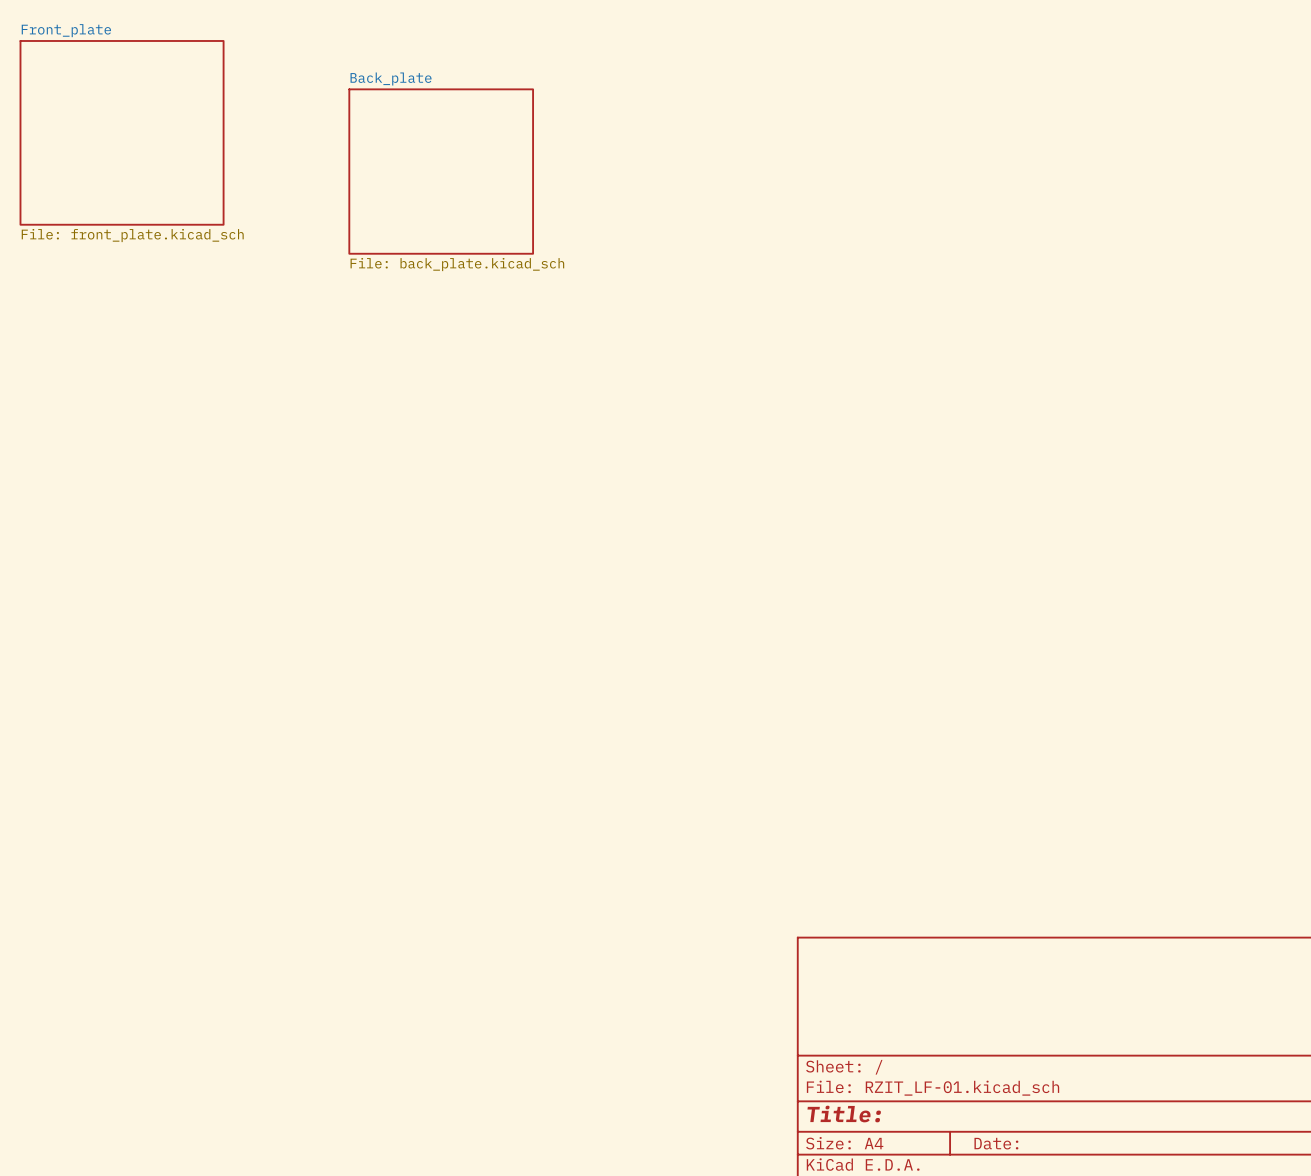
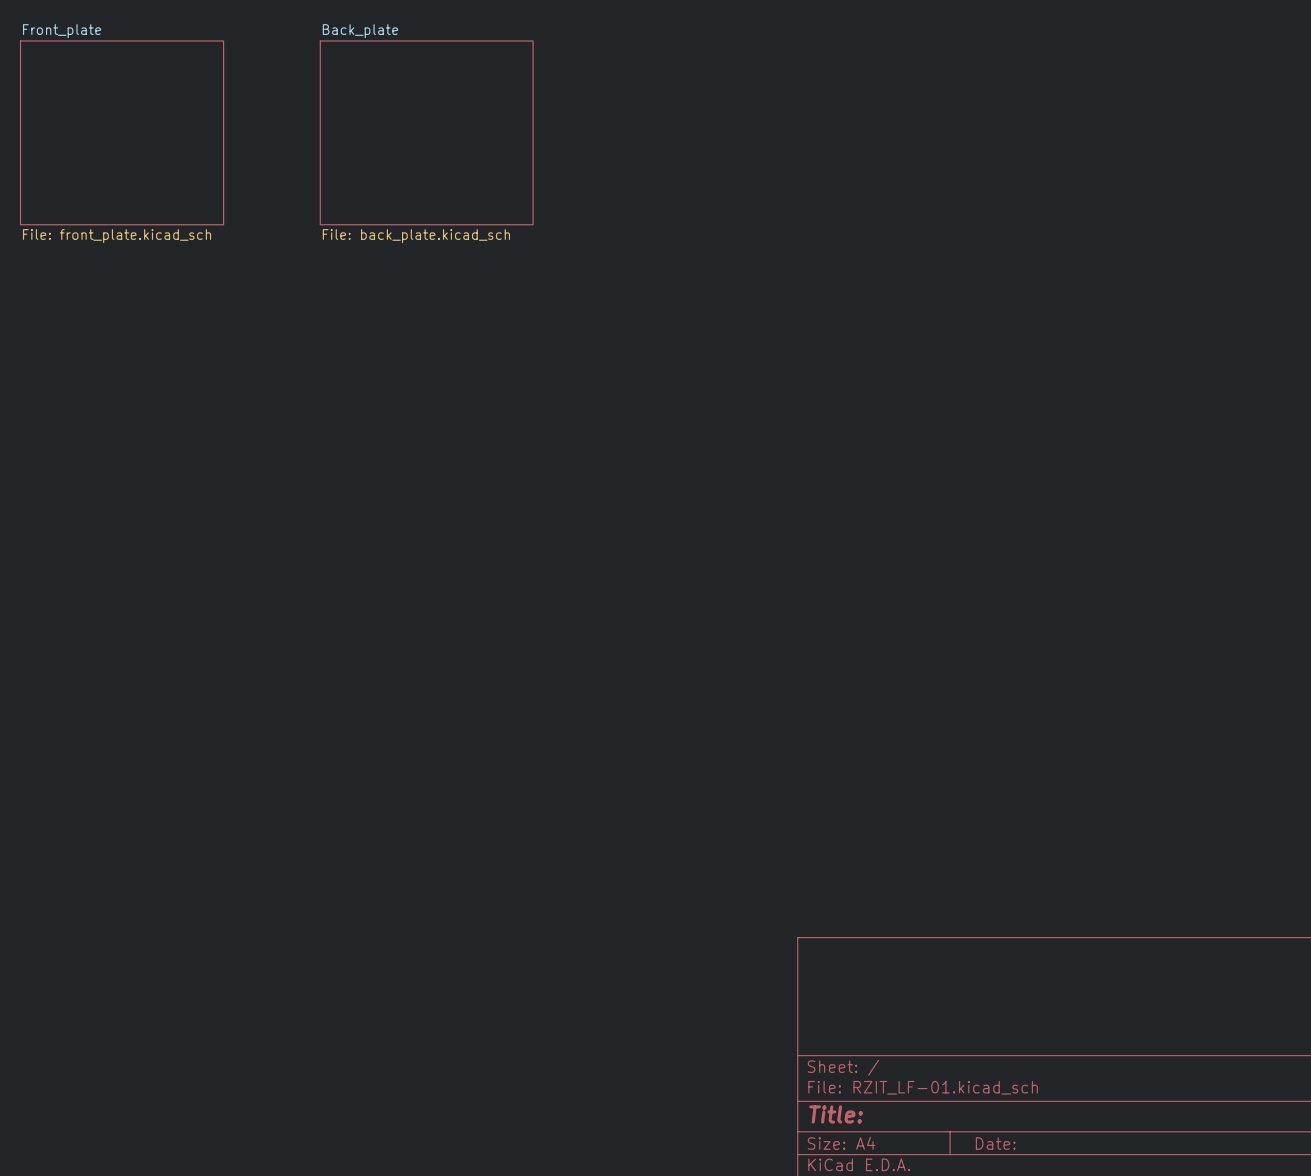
sheet Back_plate: none -> File: back_plate.kicad_sch (426, 132)
sheet Back_plate: File: back_plate.kicad_sch (441, 171) -> none

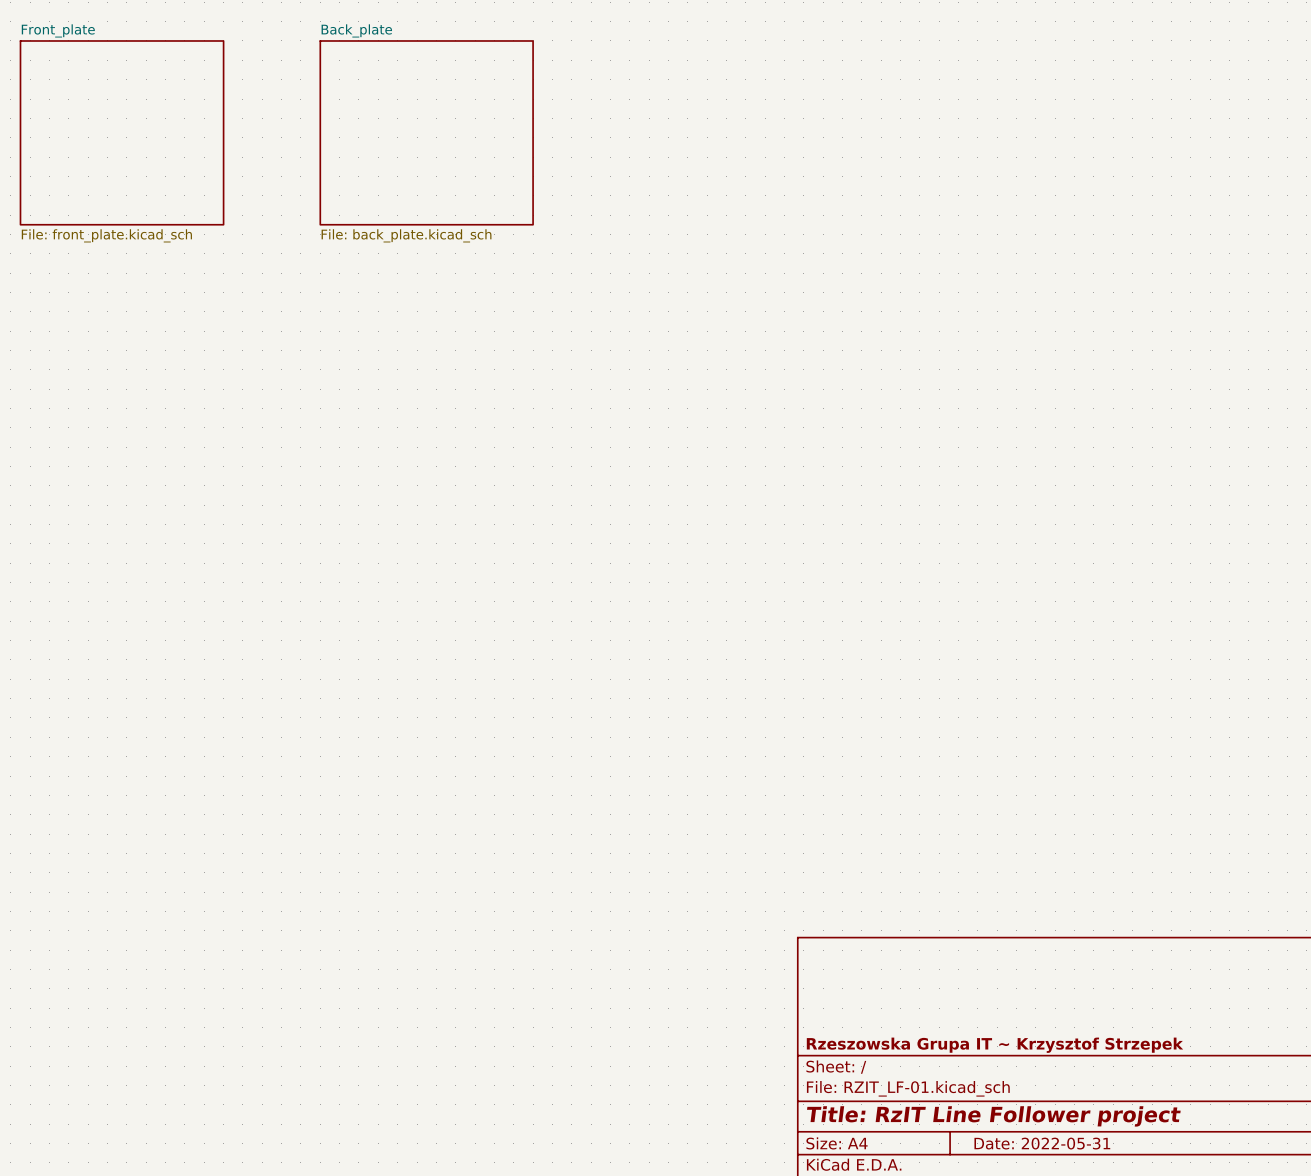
title block: none -> Rzeszowska Grupa IT ~ Krzysztof Strzepek (994, 1045)
title block: Title: (836, 1114) -> Title: RzIT Line Follower project (993, 1116)
title block: Date: (995, 1143) -> Date: 2022-05-31 (1042, 1143)

